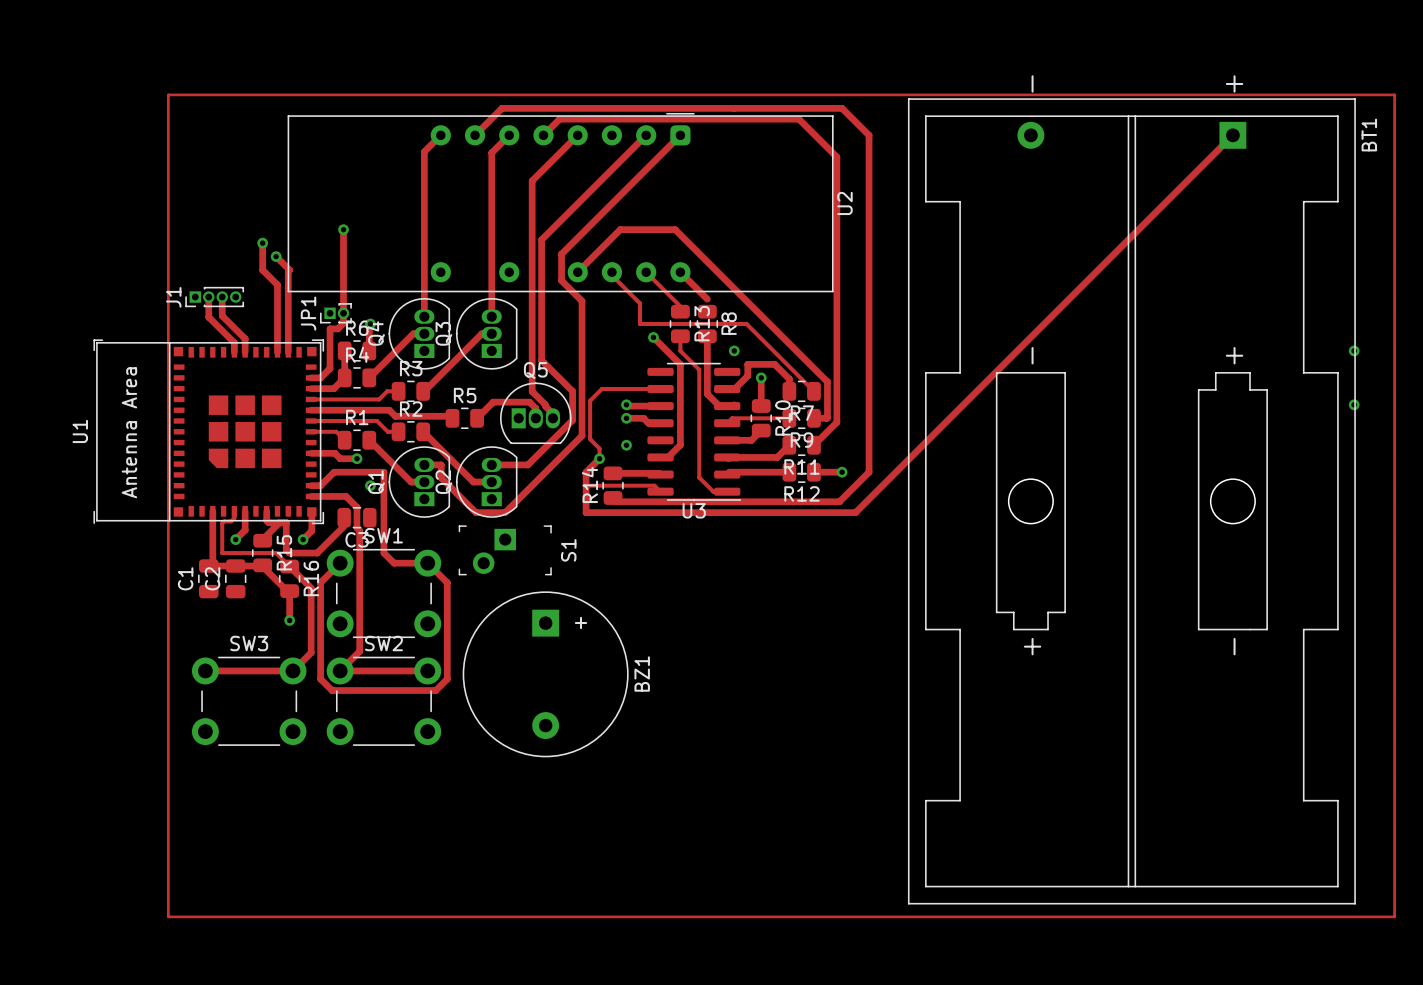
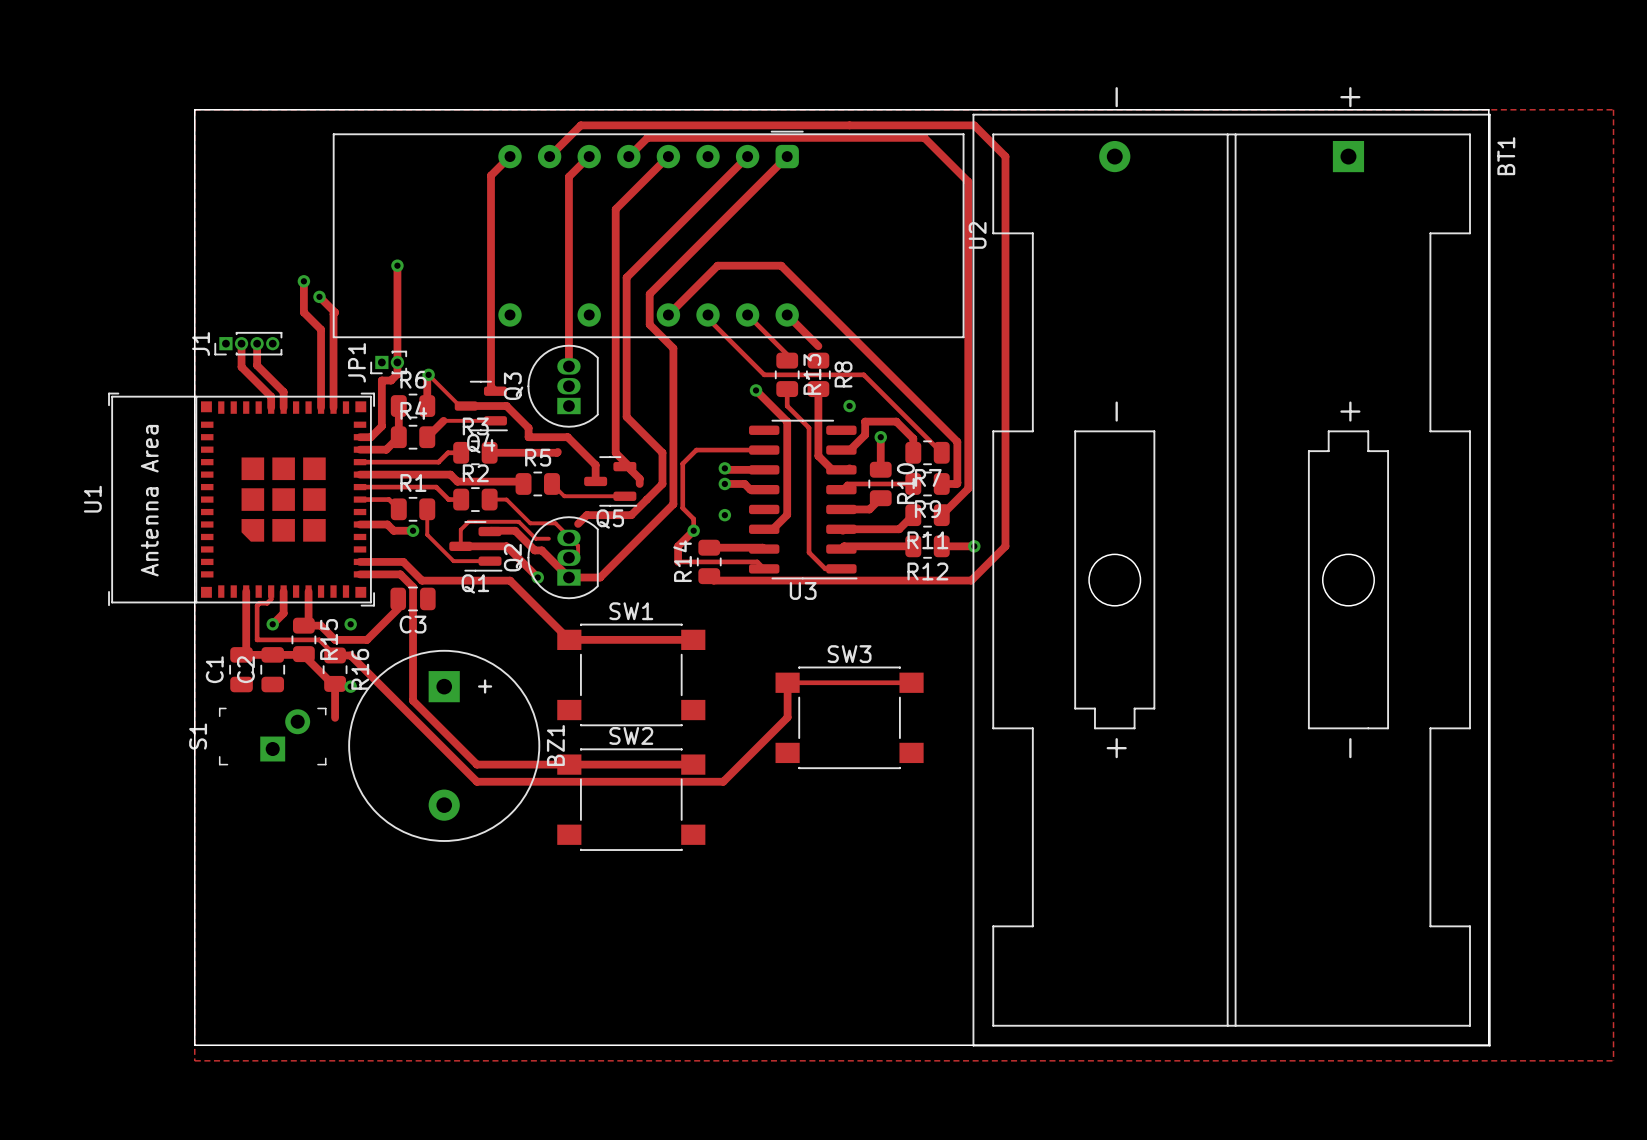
track: (168, 94) (168, 916) (1394, 916) (1394, 94) (168, 94) -> none
board edge: none -> (194, 109) (1488, 109) (1488, 1045) (194, 1045) (194, 109)
track: (1232, 135) (855, 512) (586, 512) (586, 485) -> none
Q4 footprint: [388, 297, 451, 370] -> [454, 380, 508, 432]
track: (639, 303) (639, 323) (660, 323) -> (740, 351) (764, 374)
track: none -> (490, 366) (490, 386) (495, 391)
track: none -> (428, 374) (459, 406) (506, 406) (528, 428) (528, 437) (567, 437) (595, 465) (595, 481)
Q4 name position: Q4 (376, 333) -> Q4 (481, 443)
track: (424, 333) (413, 333) (383, 363) -> (495, 420) (443, 420)
track: (491, 333) (481, 333) (424, 391) -> (557, 452) (490, 452)
via: (1354, 350) -> none
Q5 name position: Q5 (535, 370) -> Q5 (610, 519)
Q5 footprint: [499, 382, 572, 445] -> [584, 456, 638, 507]
via: (1354, 404) -> none
track: (477, 418) (493, 402) (529, 402) (535, 408) (535, 418) -> (551, 483) (564, 496) (624, 496)
track: (572, 418) (527, 464) (491, 464) -> (662, 483) (631, 515) (586, 515) (578, 523)
track: (423, 431) (473, 482) (491, 482) -> (489, 499) (506, 499) (530, 523) (555, 523) (578, 545) (578, 553)
track: (369, 440) (411, 482) (424, 482) -> (427, 509) (427, 534) (453, 561) (490, 561)
Q1 footprint: [388, 446, 451, 518] -> [449, 521, 503, 572]
track: (424, 464) (441, 464) (441, 477) (475, 512) (505, 512) (518, 499) -> (490, 531) (515, 530) (534, 550) (541, 550) (568, 577) (600, 577)
track: none -> (548, 538) (535, 538) (518, 521) (468, 521) (460, 529) (460, 546) (506, 546) (537, 577)
Q1 name position: Q1 (376, 482) -> Q1 (475, 583)
track: (320, 485) (334, 472) (383, 472) (383, 553) (394, 563) (427, 563) (447, 582) (447, 679) (435, 690) (332, 690) (320, 679) (320, 582) (340, 563) -> (370, 561) (403, 561) (422, 580) (510, 580) (569, 639) (693, 639)
via: (370, 485) -> none
via: none -> (537, 577)
BT1 position: (1131, 501) -> (1231, 580)
track: (311, 511) (311, 530) (303, 539) -> none
track: (266, 520) (268, 522) (286, 522) (286, 549) -> (308, 602) (308, 620) (303, 625) (320, 625) (331, 635)
track: (279, 522) (262, 539) -> none
track: (356, 528) (359, 530) (359, 651) (340, 670) (427, 670) -> (413, 610) (413, 700) (476, 764) (693, 764)
SW1 footprint: [326, 548, 442, 639] -> [557, 623, 706, 727]
S1 rotation: 0° (505, 550) -> 180° (272, 736)
S1 position: (505, 550) -> (272, 736)
track: (289, 566) (311, 588) (311, 652) (292, 670) (205, 670) -> none
track: none -> (336, 655) (350, 655) (476, 781) (723, 781) (787, 717) (787, 682) (911, 682)
via position: (289, 620) -> (350, 686)
SW3 footprint: [191, 656, 307, 746] -> [775, 666, 924, 770]
SW2 footprint: [326, 656, 442, 746] -> [557, 748, 706, 851]
BZ1 position: (545, 674) -> (444, 745)

